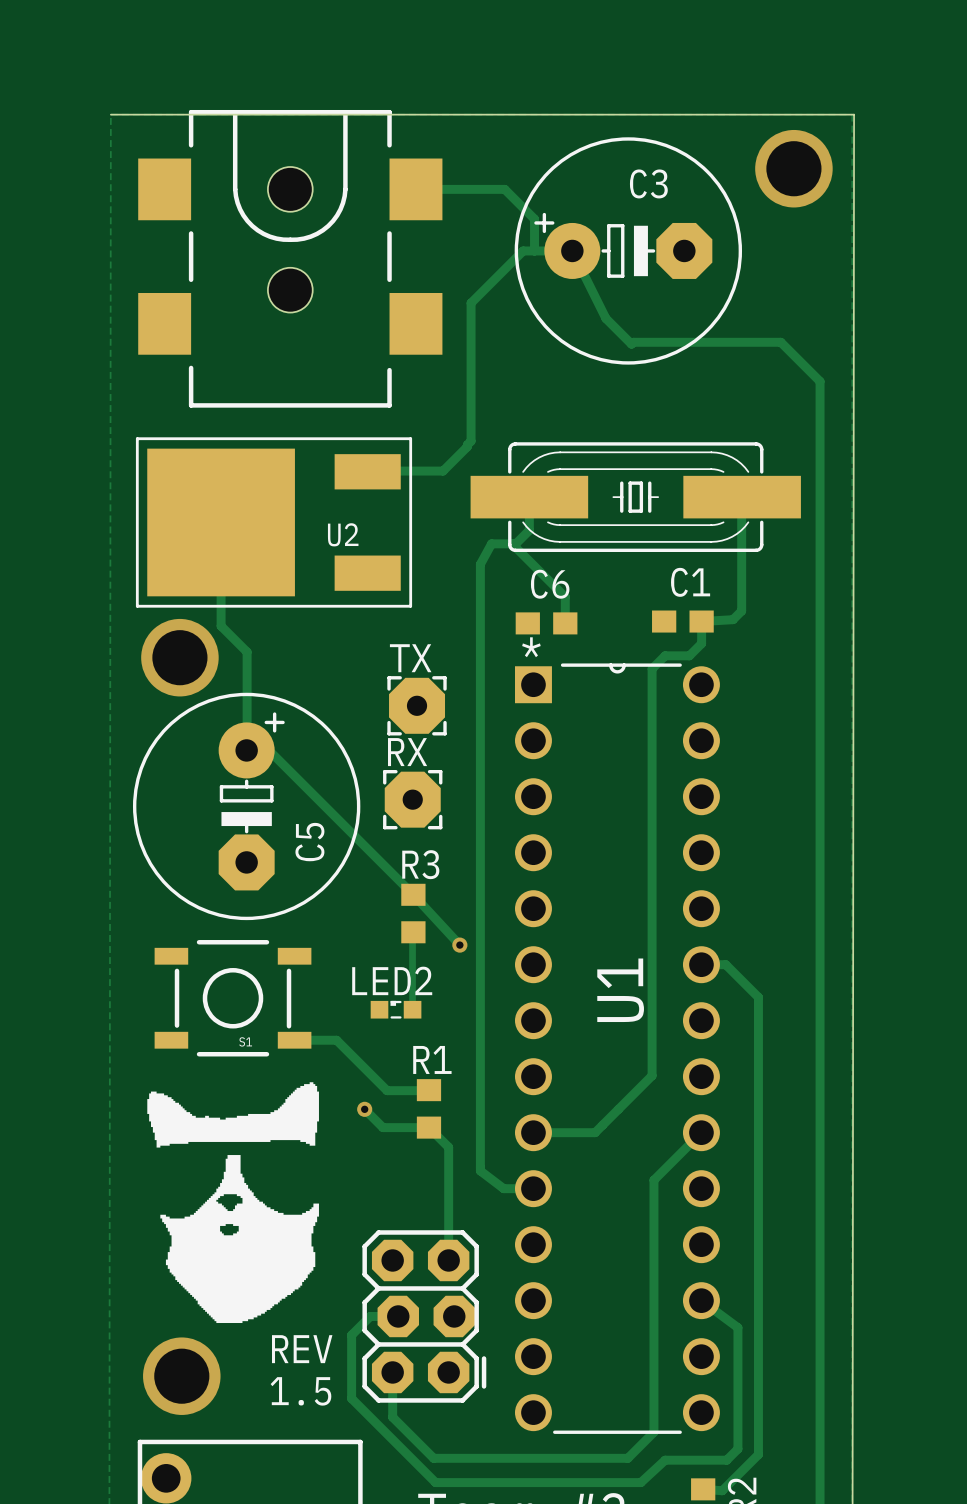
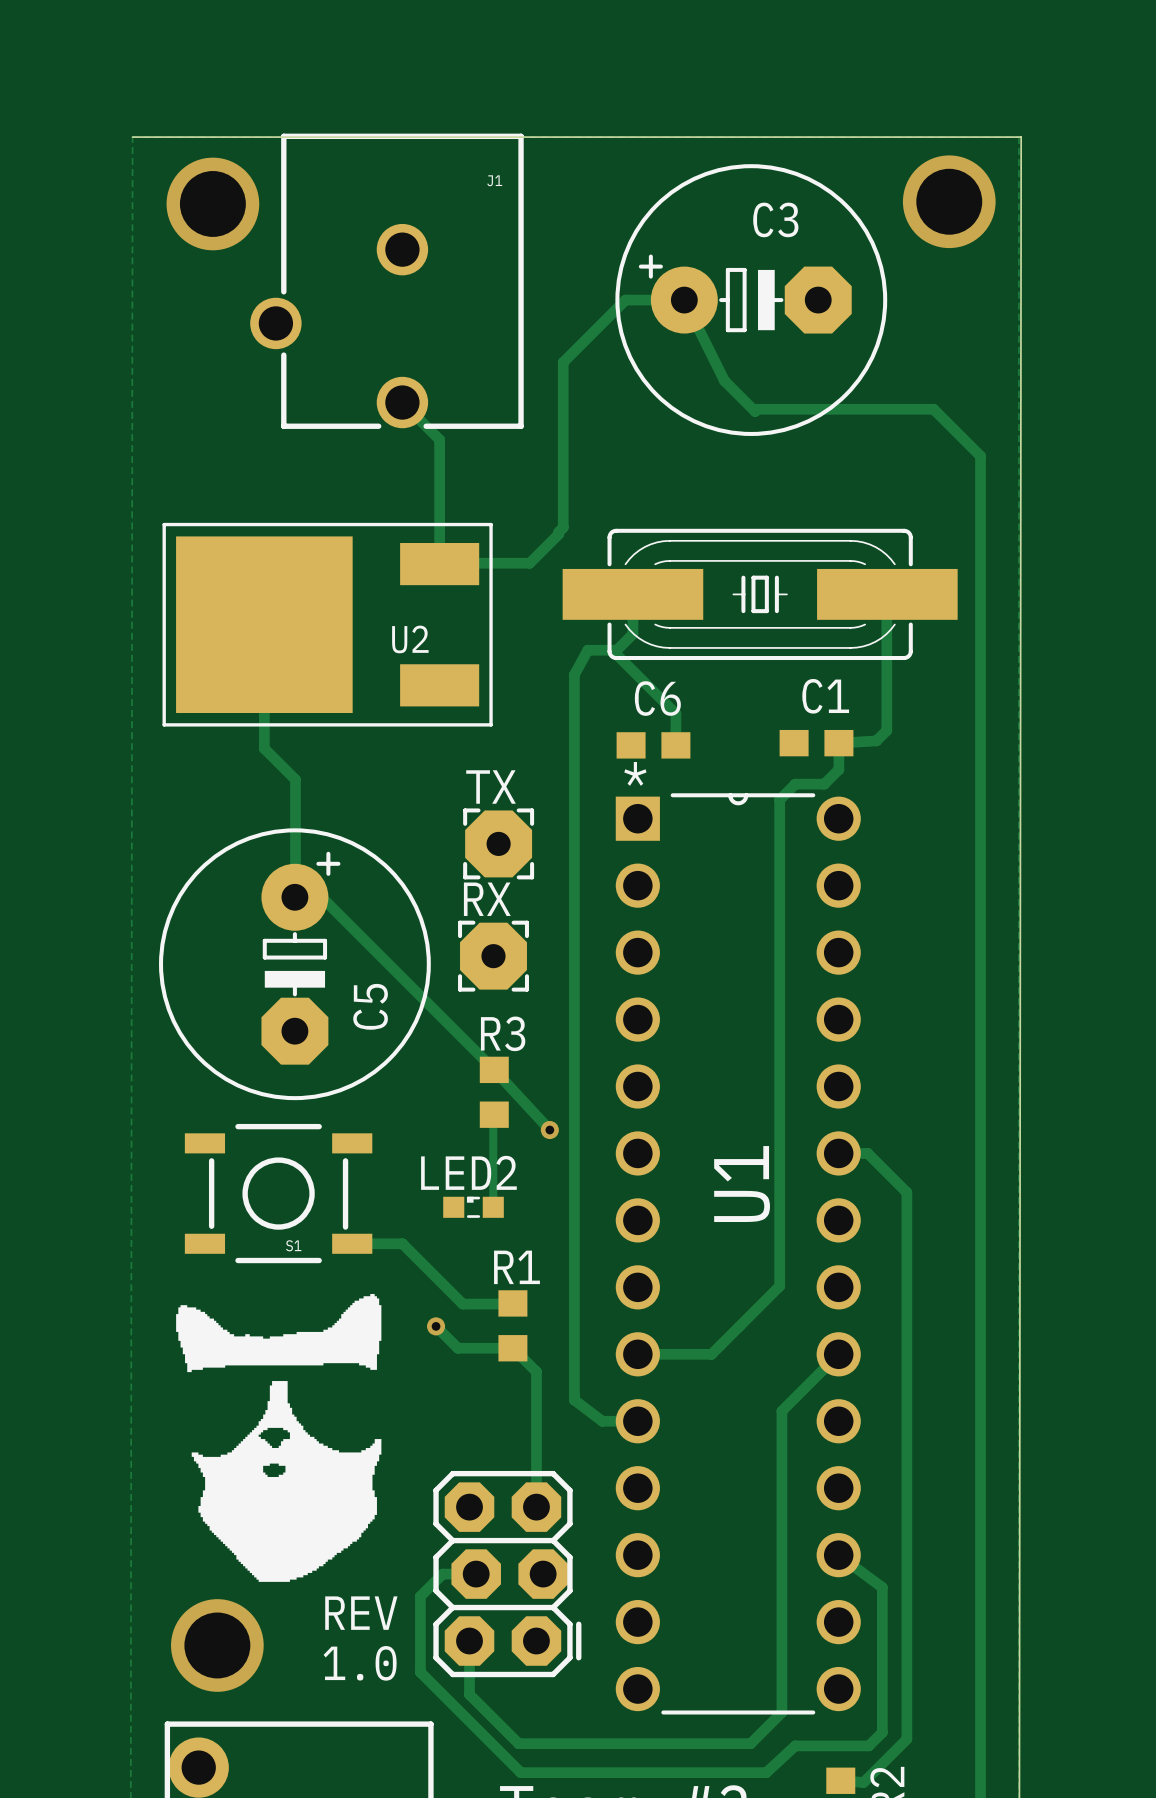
via: none -> (212, 203)
track: (415, 189) (504, 189) (534, 219) (534, 250) -> none
J1: none -> (386, 281)
part: (290, 258) -> none
track: none -> (402, 402) (439, 439) (439, 564)
via: (179, 657) -> none
text: 1.5 (300, 1391) -> 1.0 (360, 1663)

